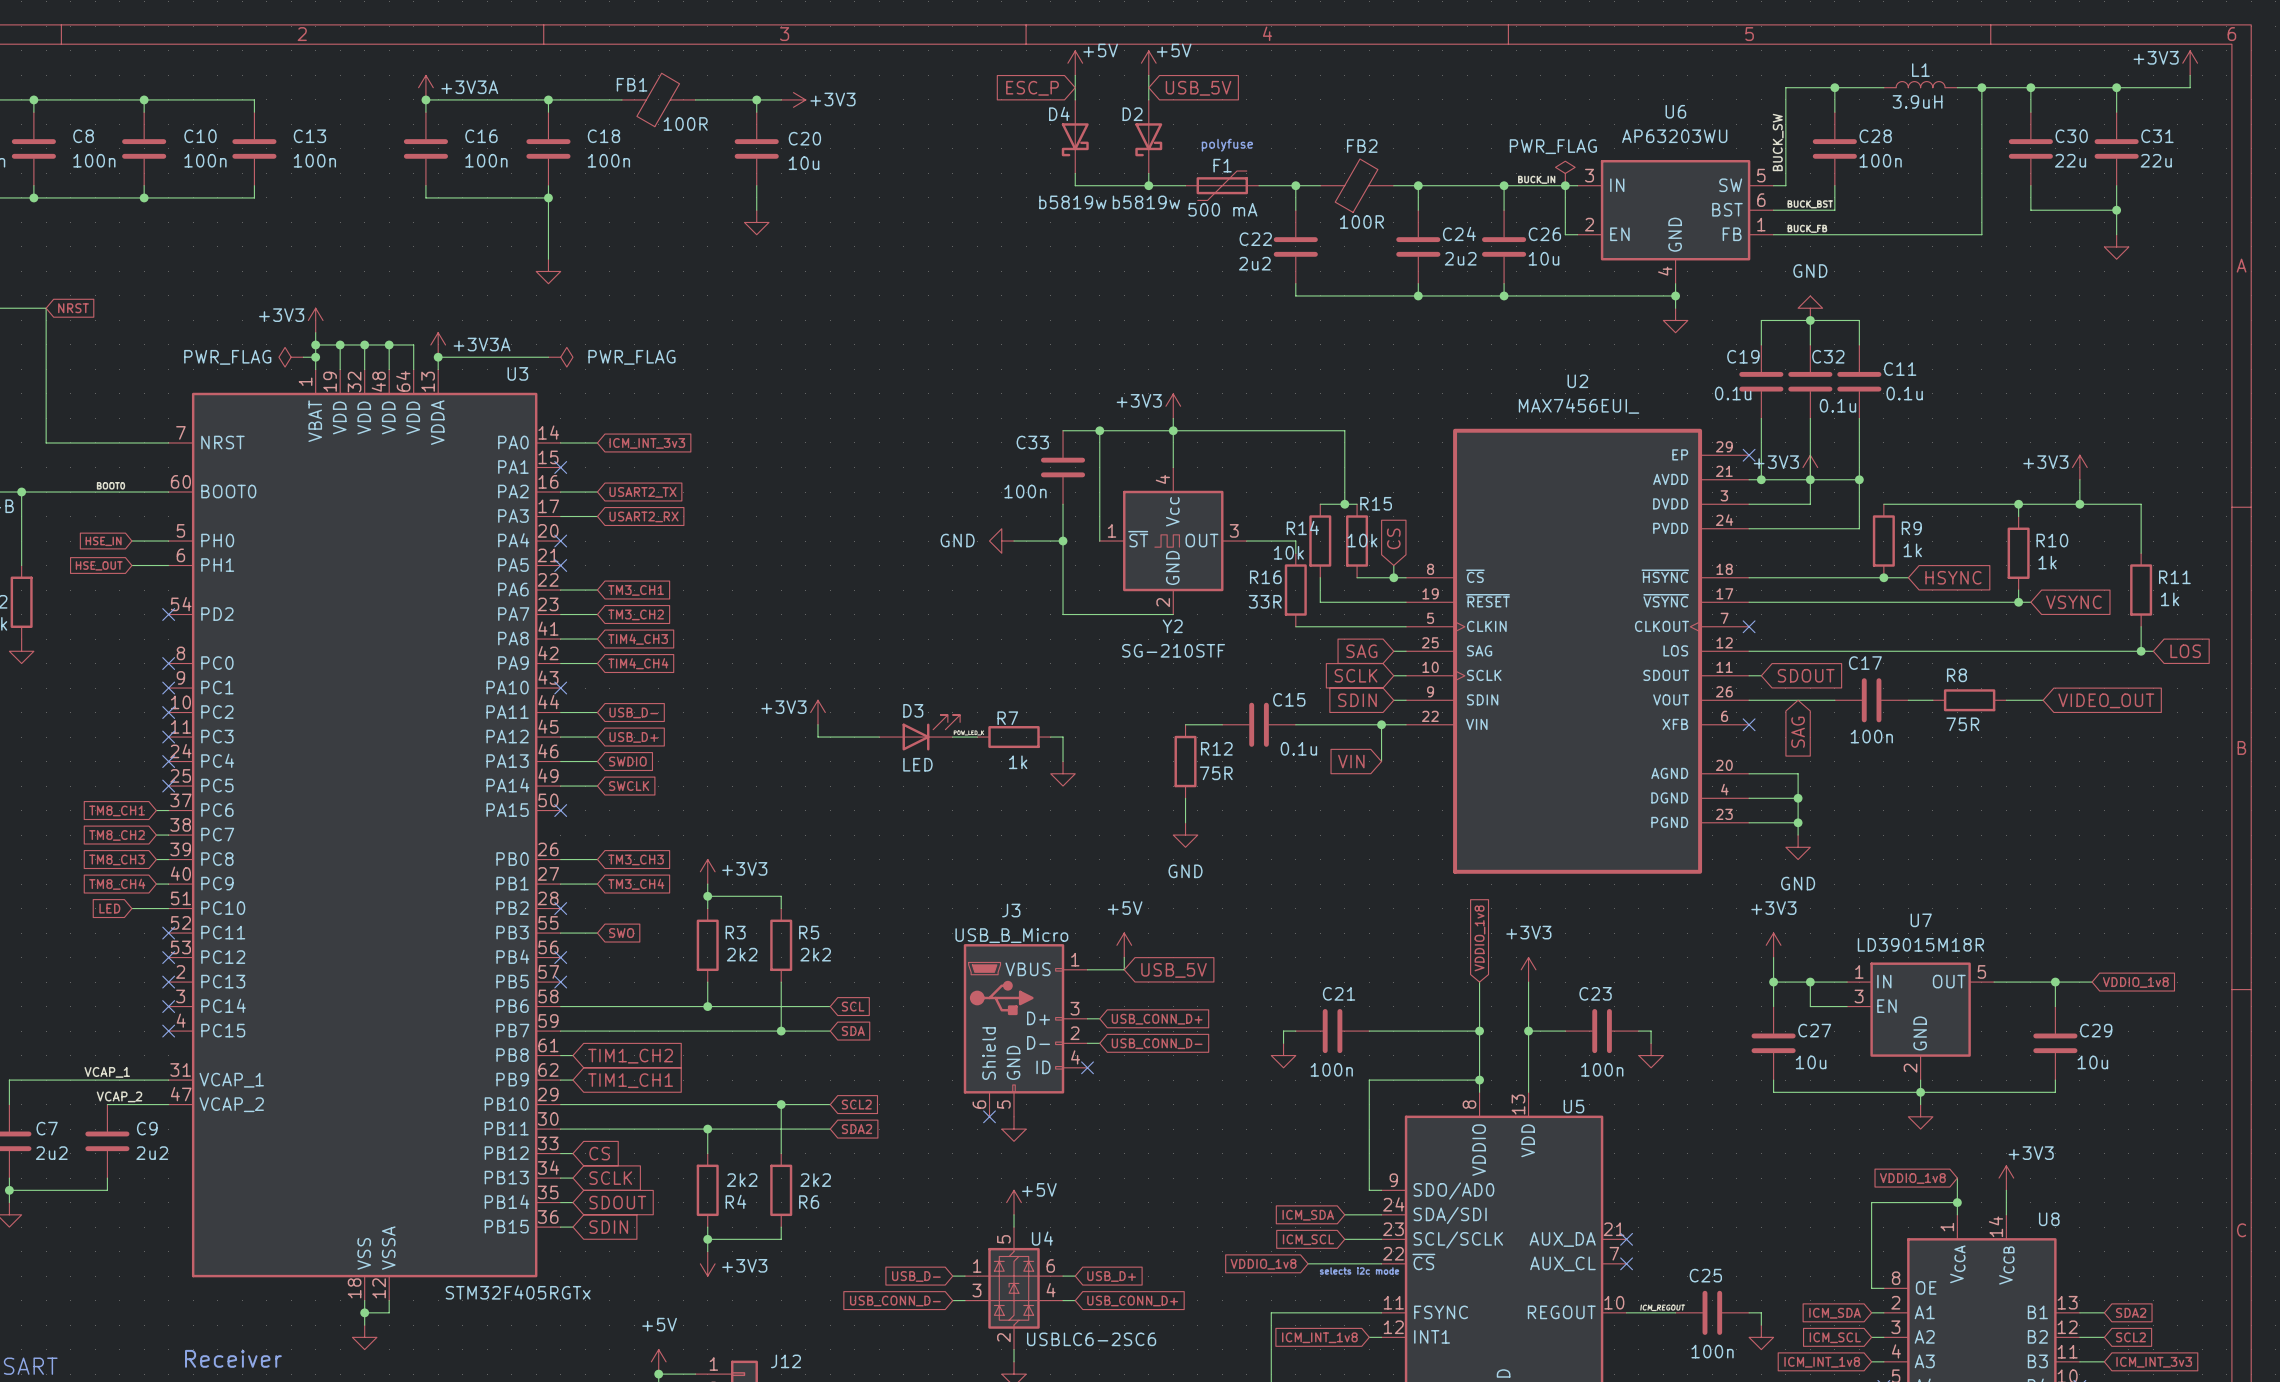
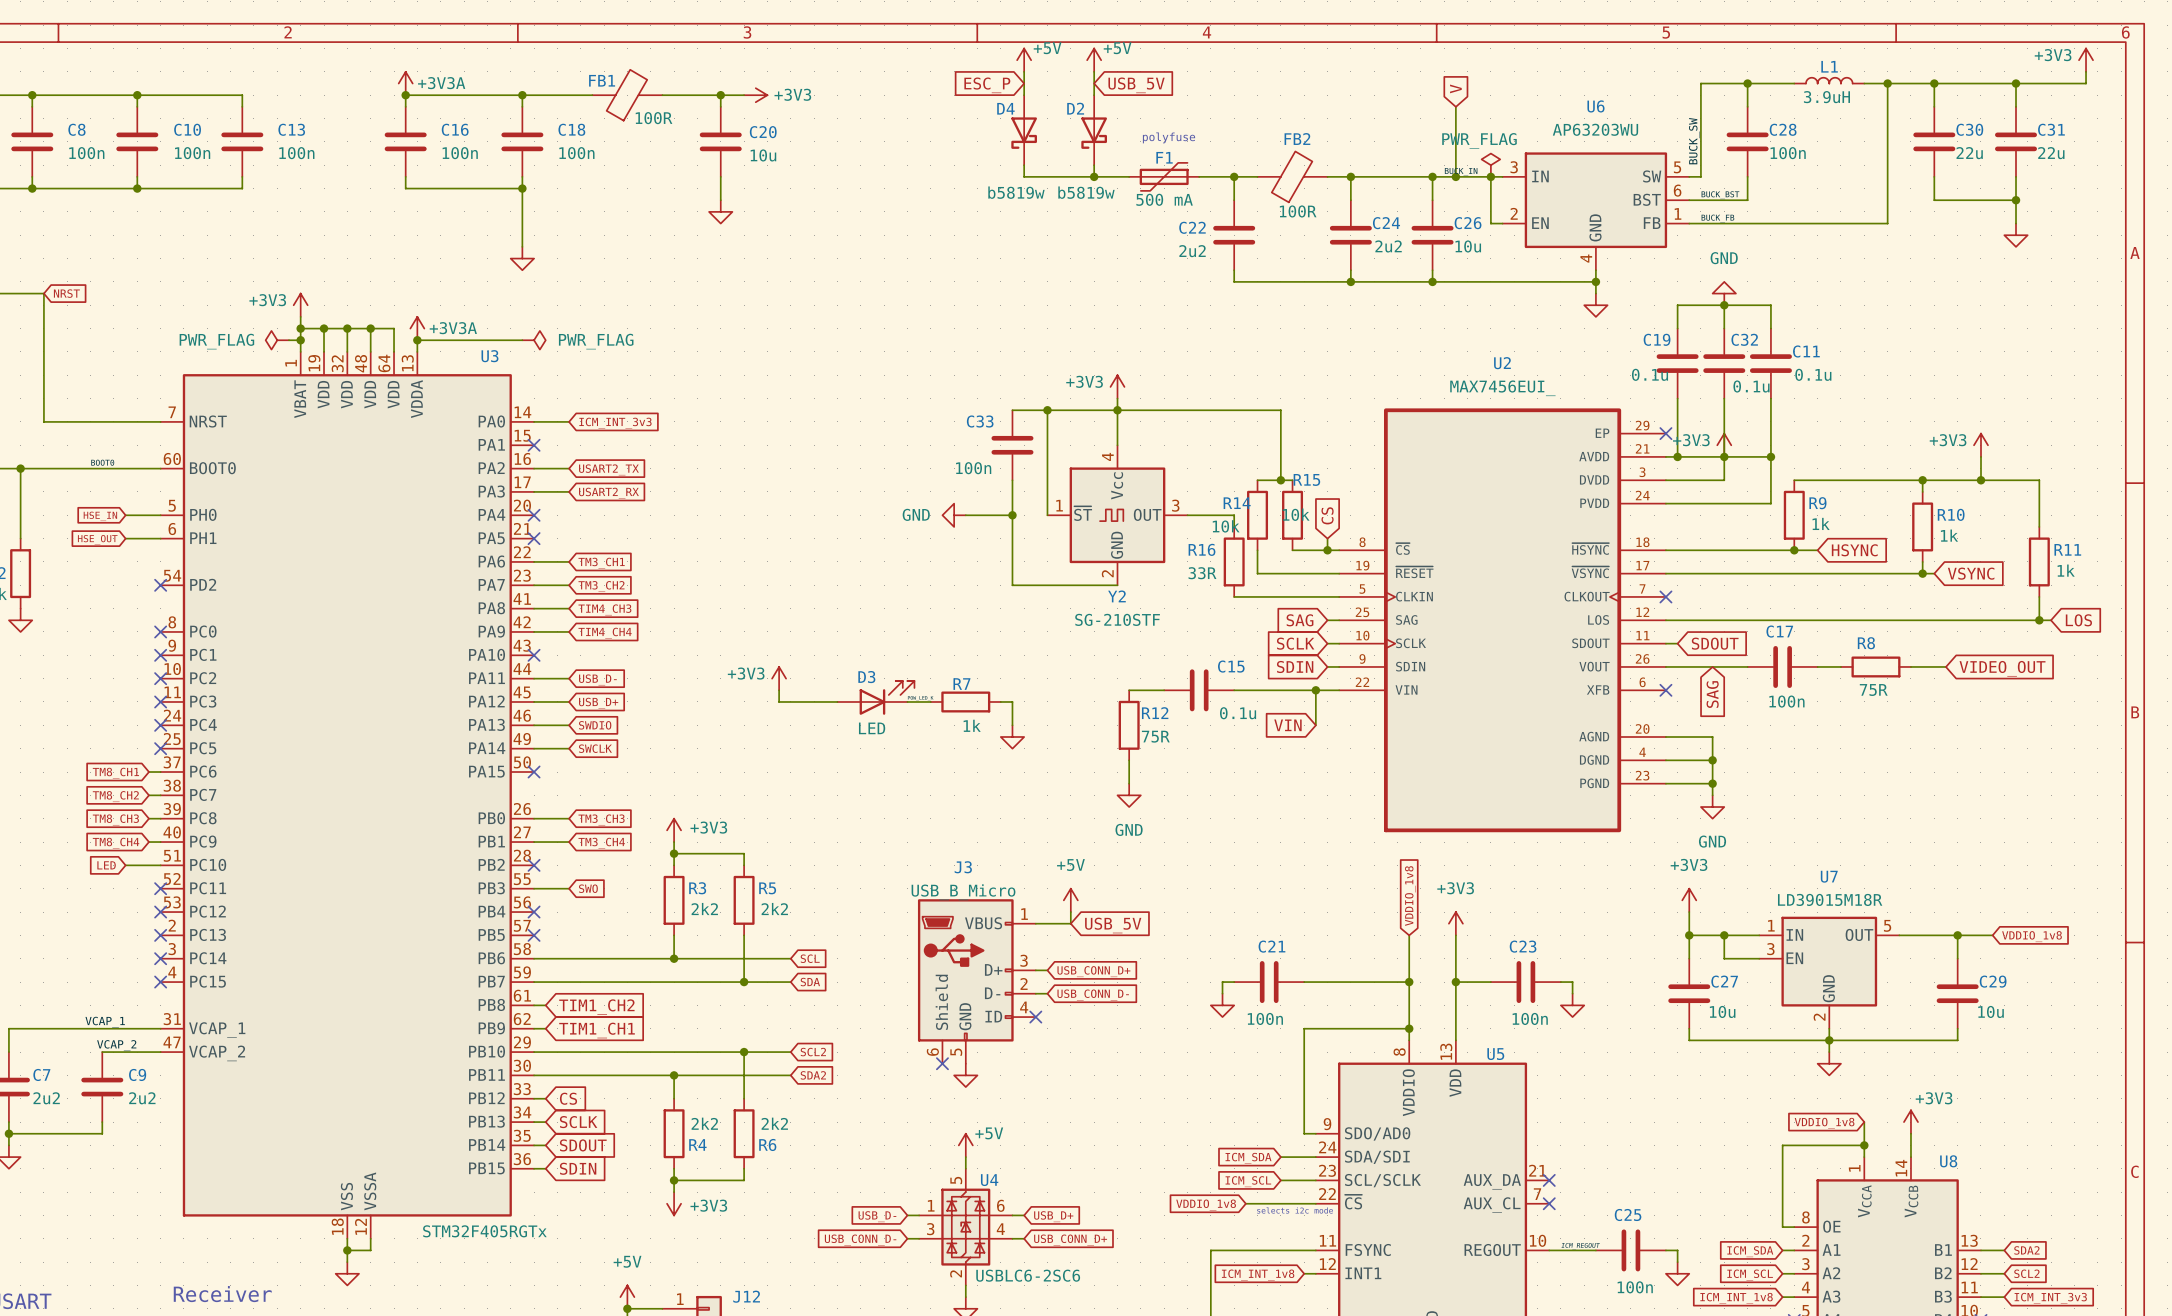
global label: none -> V (1455, 88)
wire: none -> (1455, 106) (1455, 176)
junction: none -> (1455, 176)

